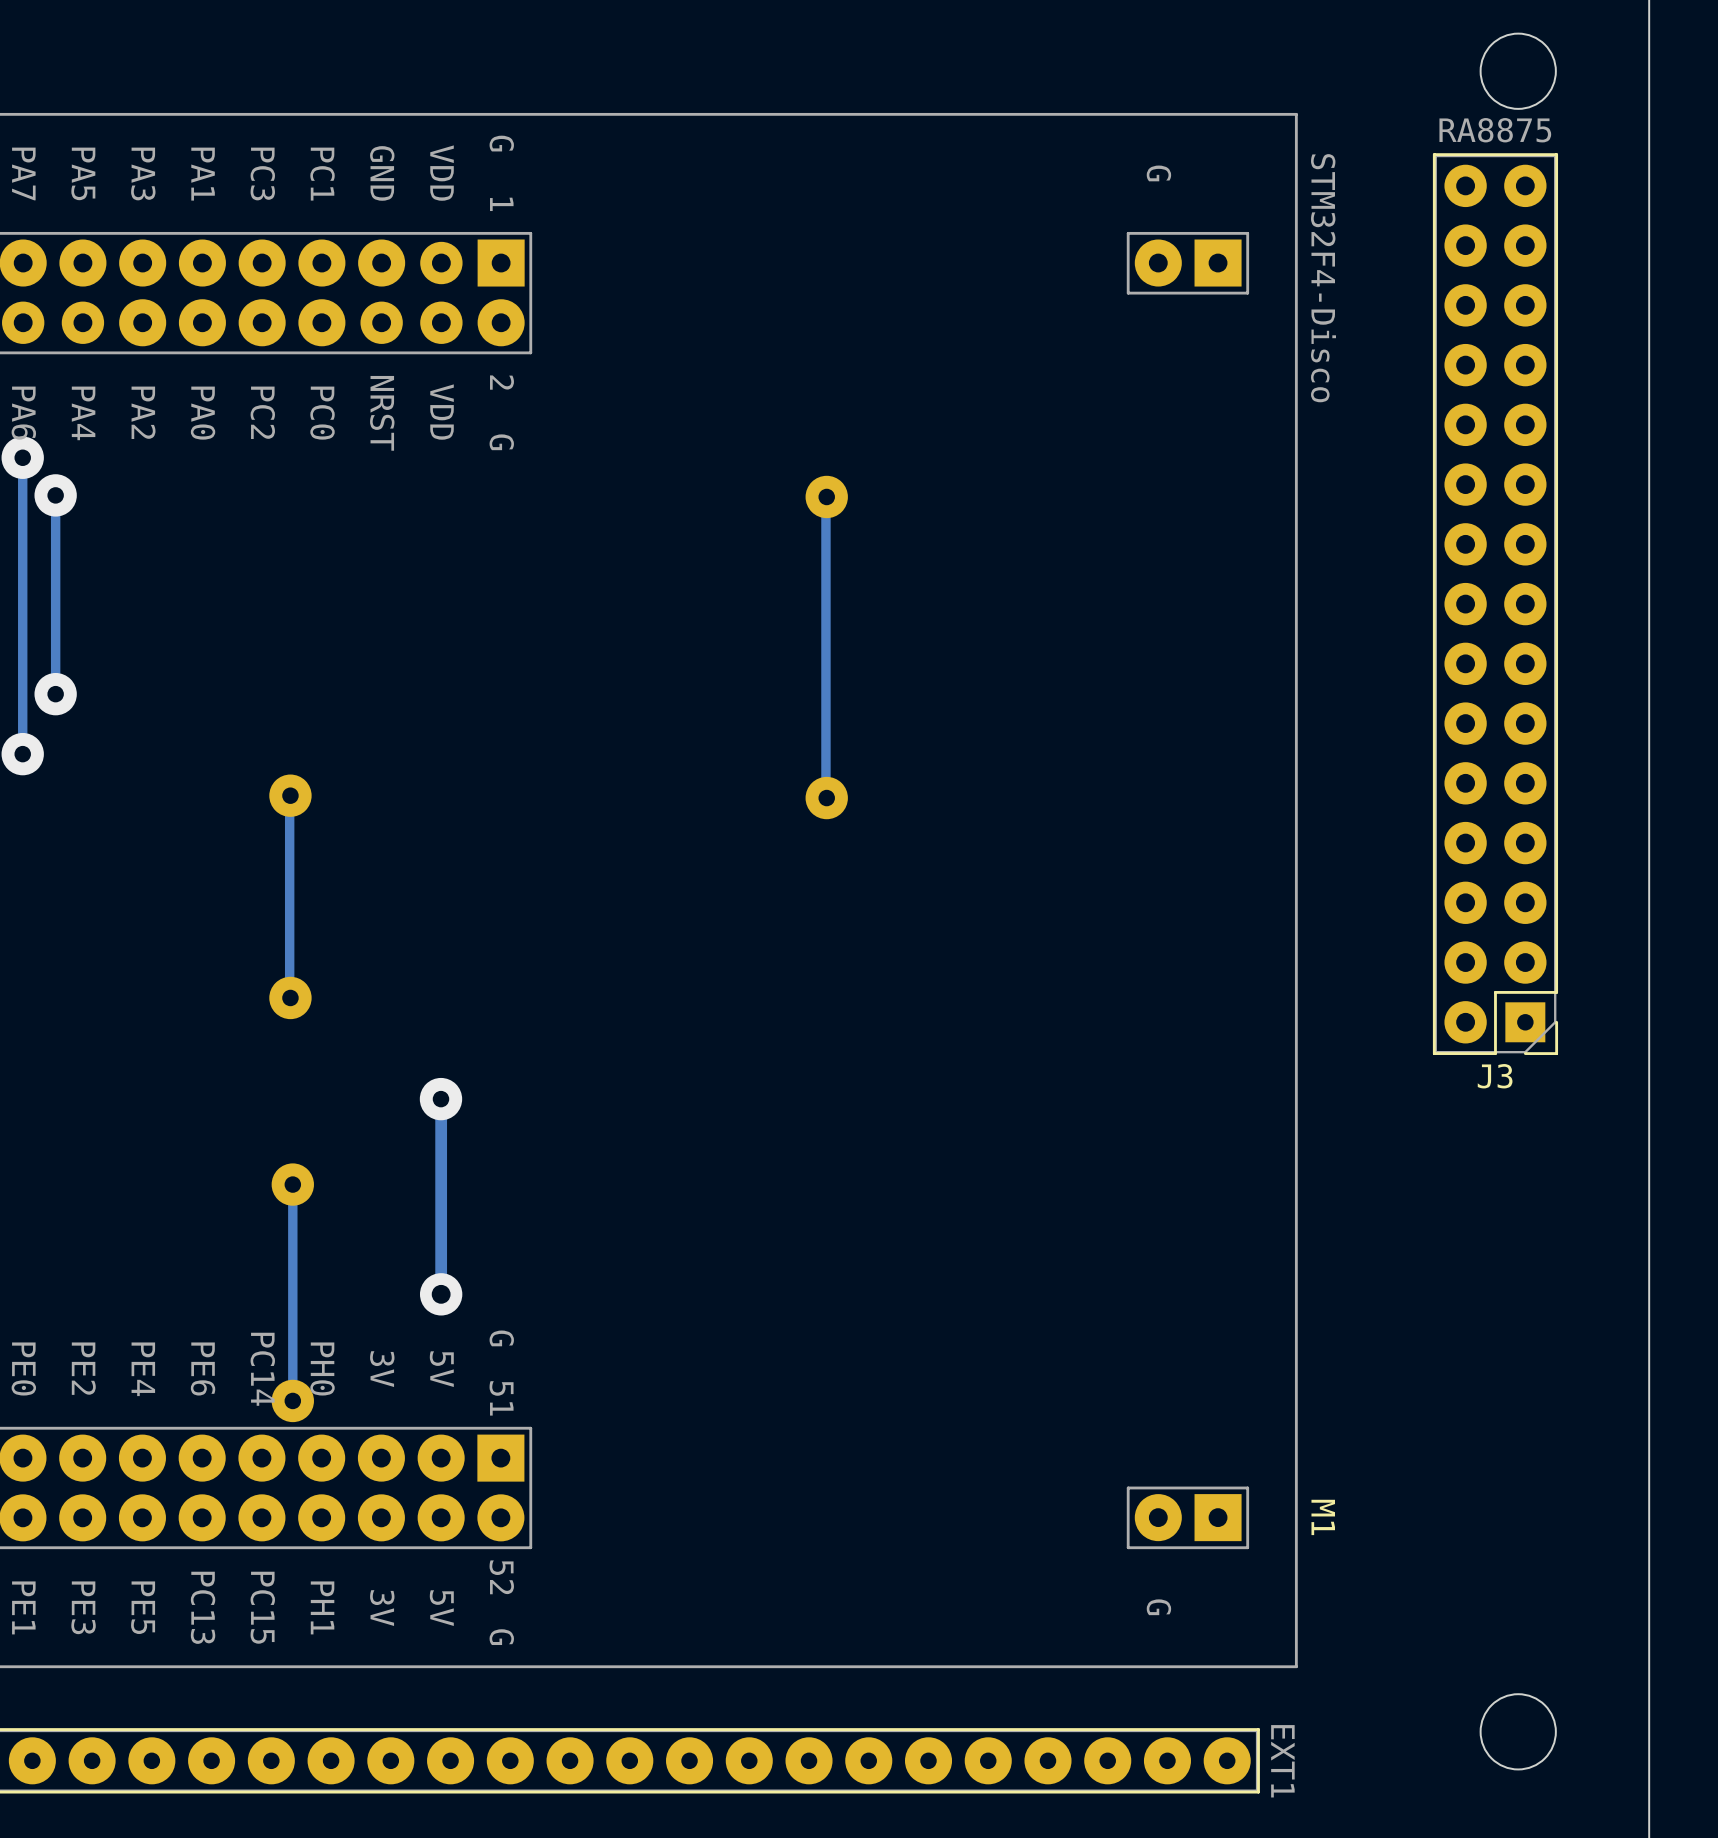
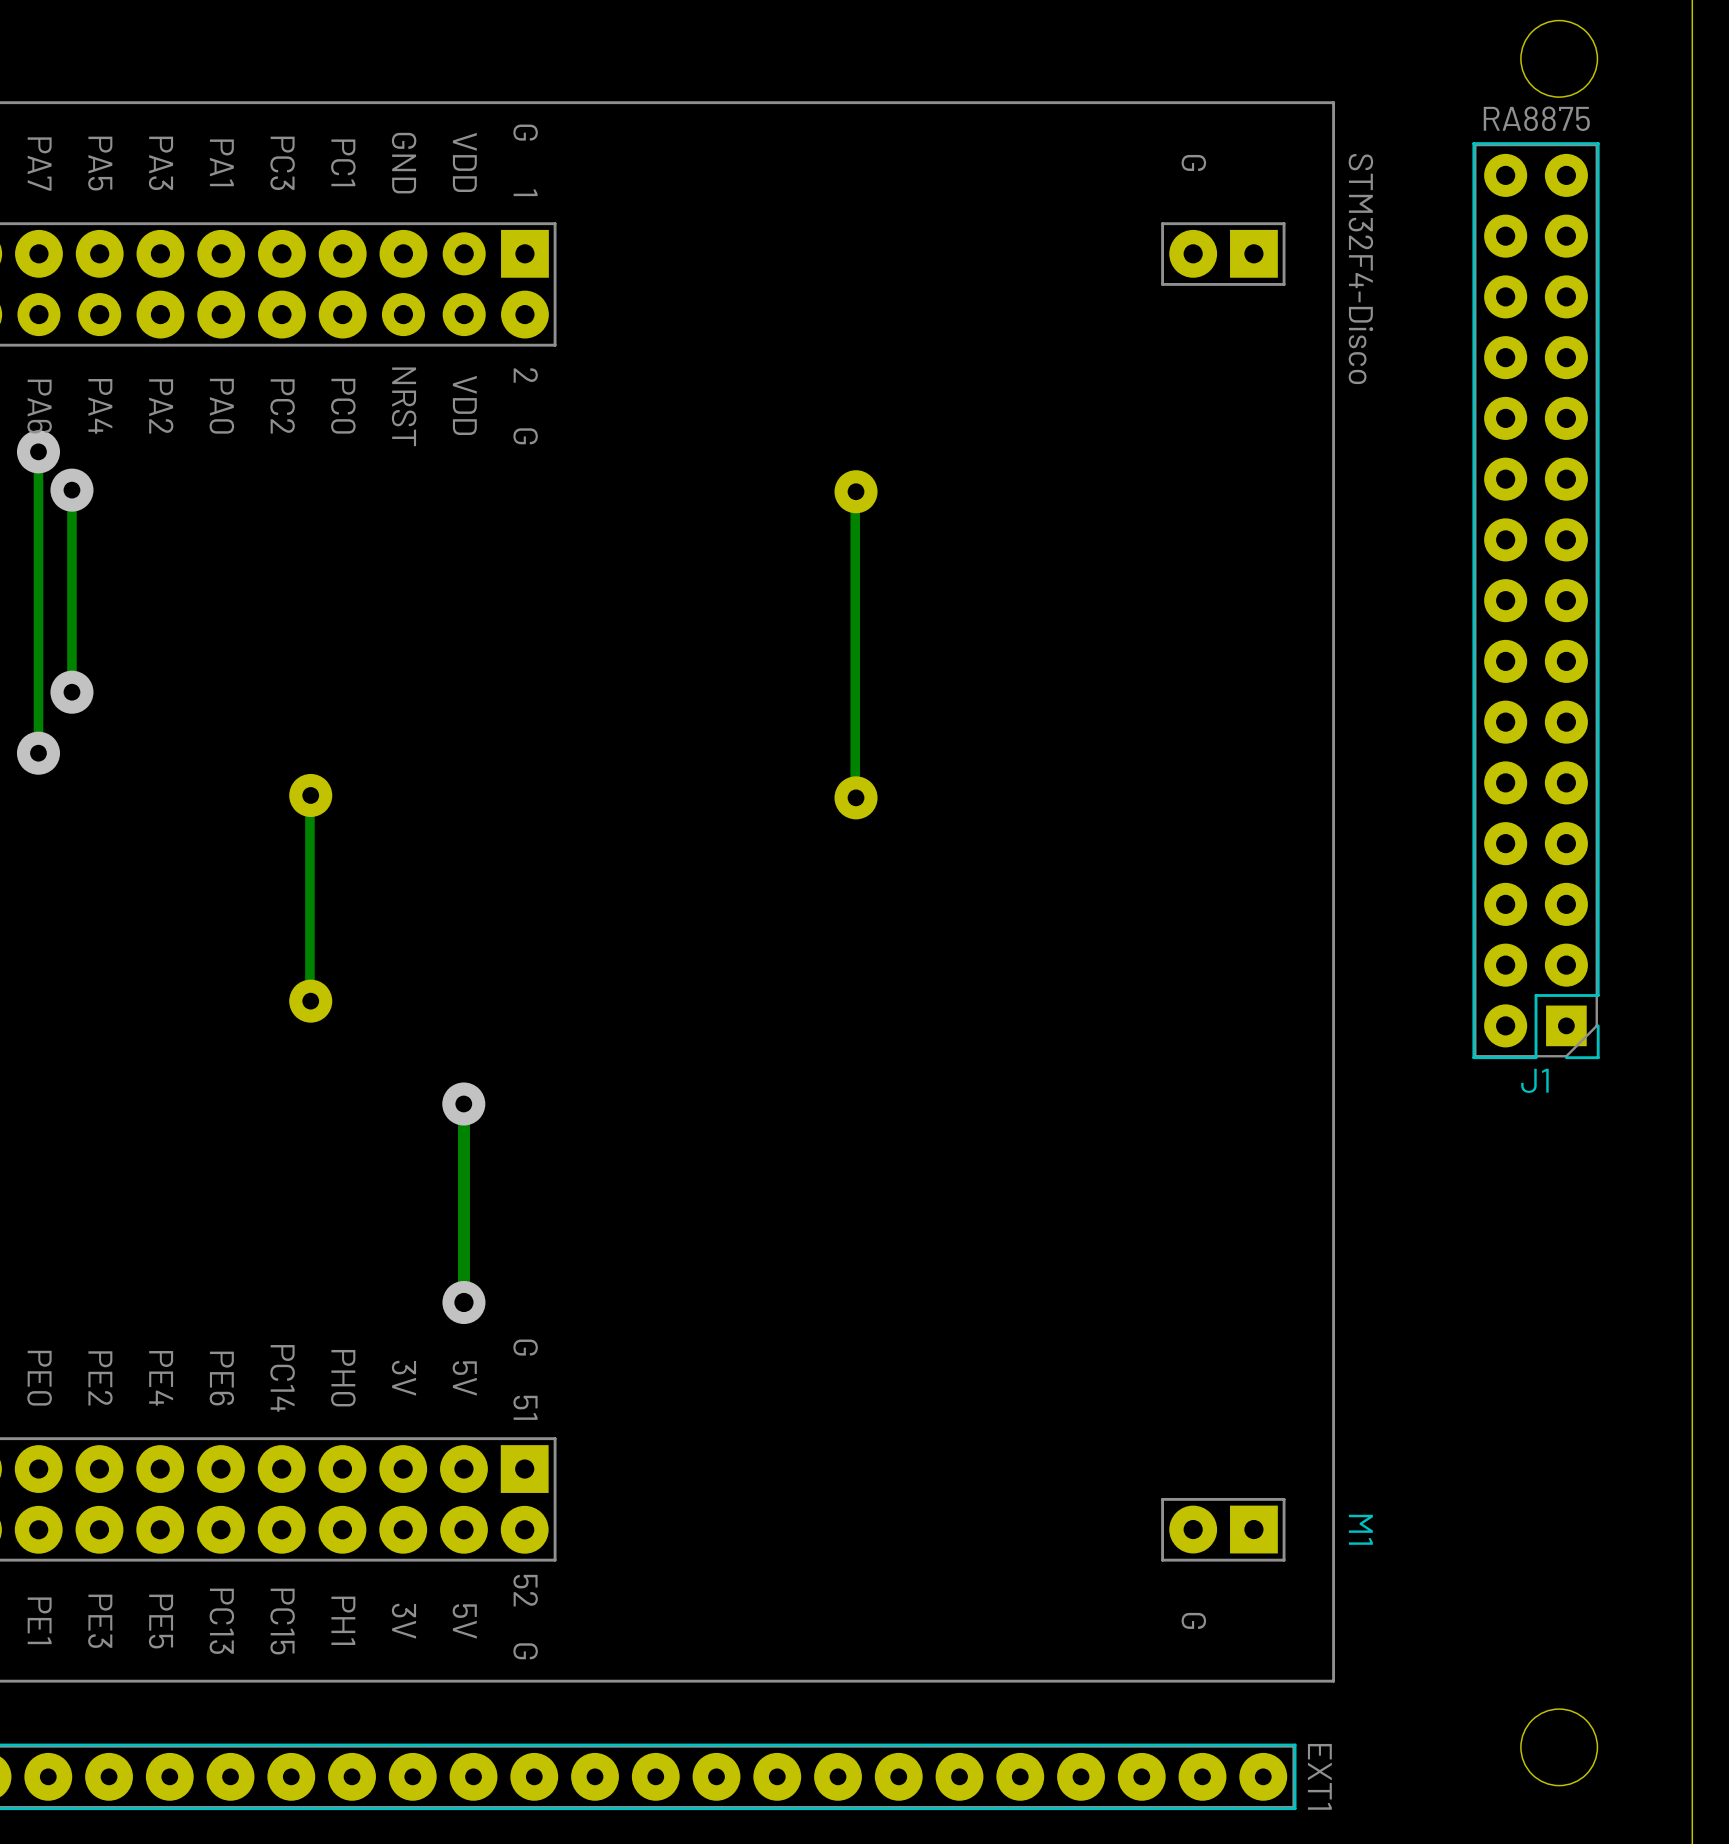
J3 name: J3 (1495, 1076) -> J1 (1534, 1080)
track: (292, 1184) (292, 1400) -> none
part: (292, 1184) -> none
part: (292, 1400) -> none

